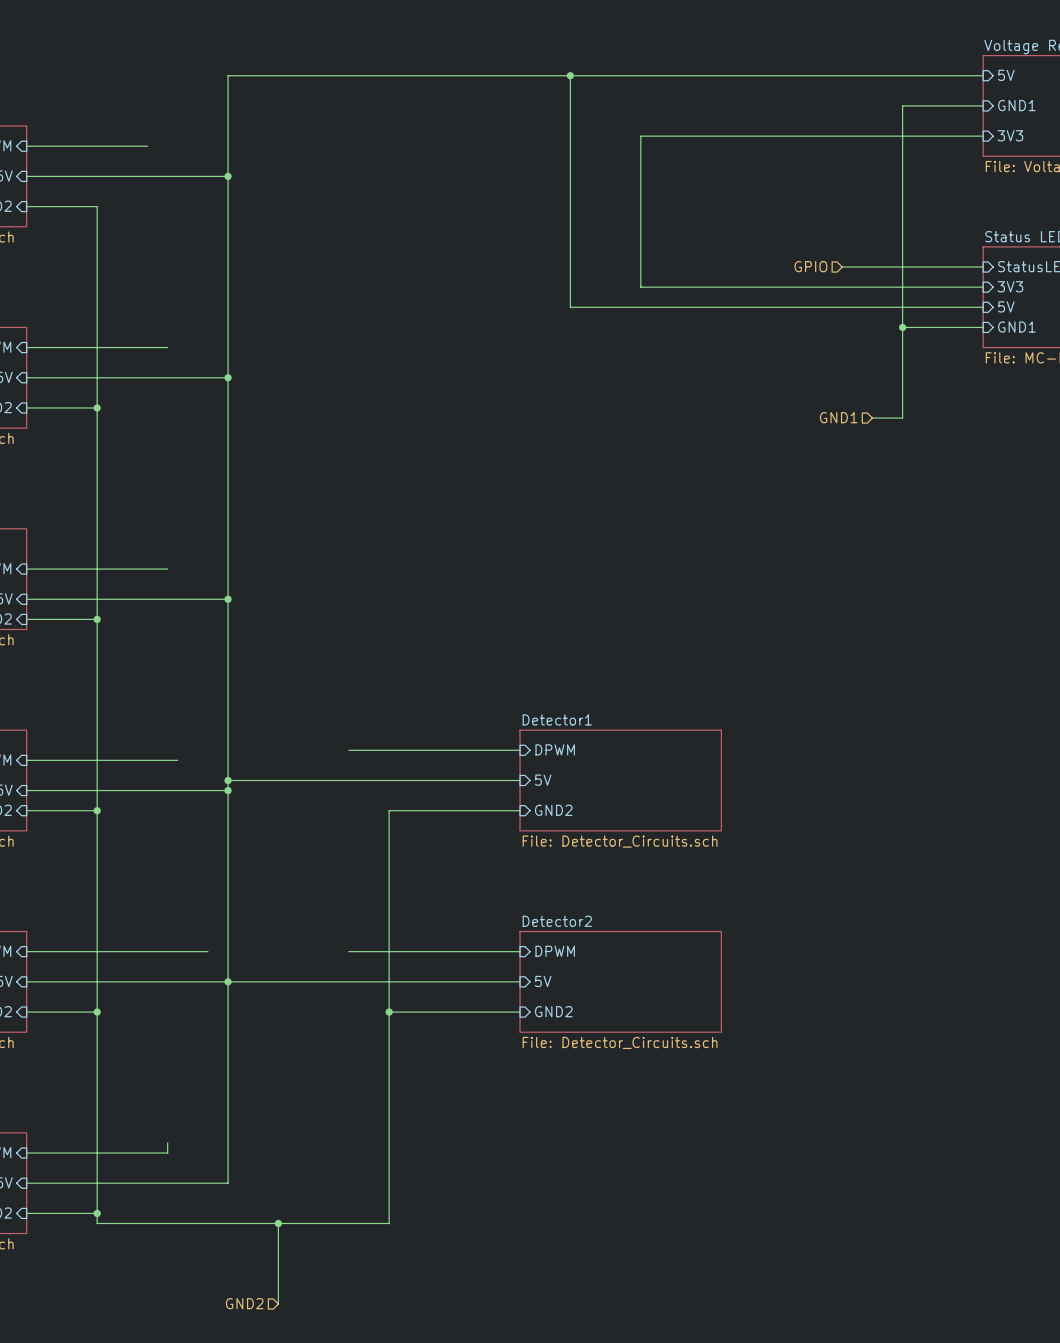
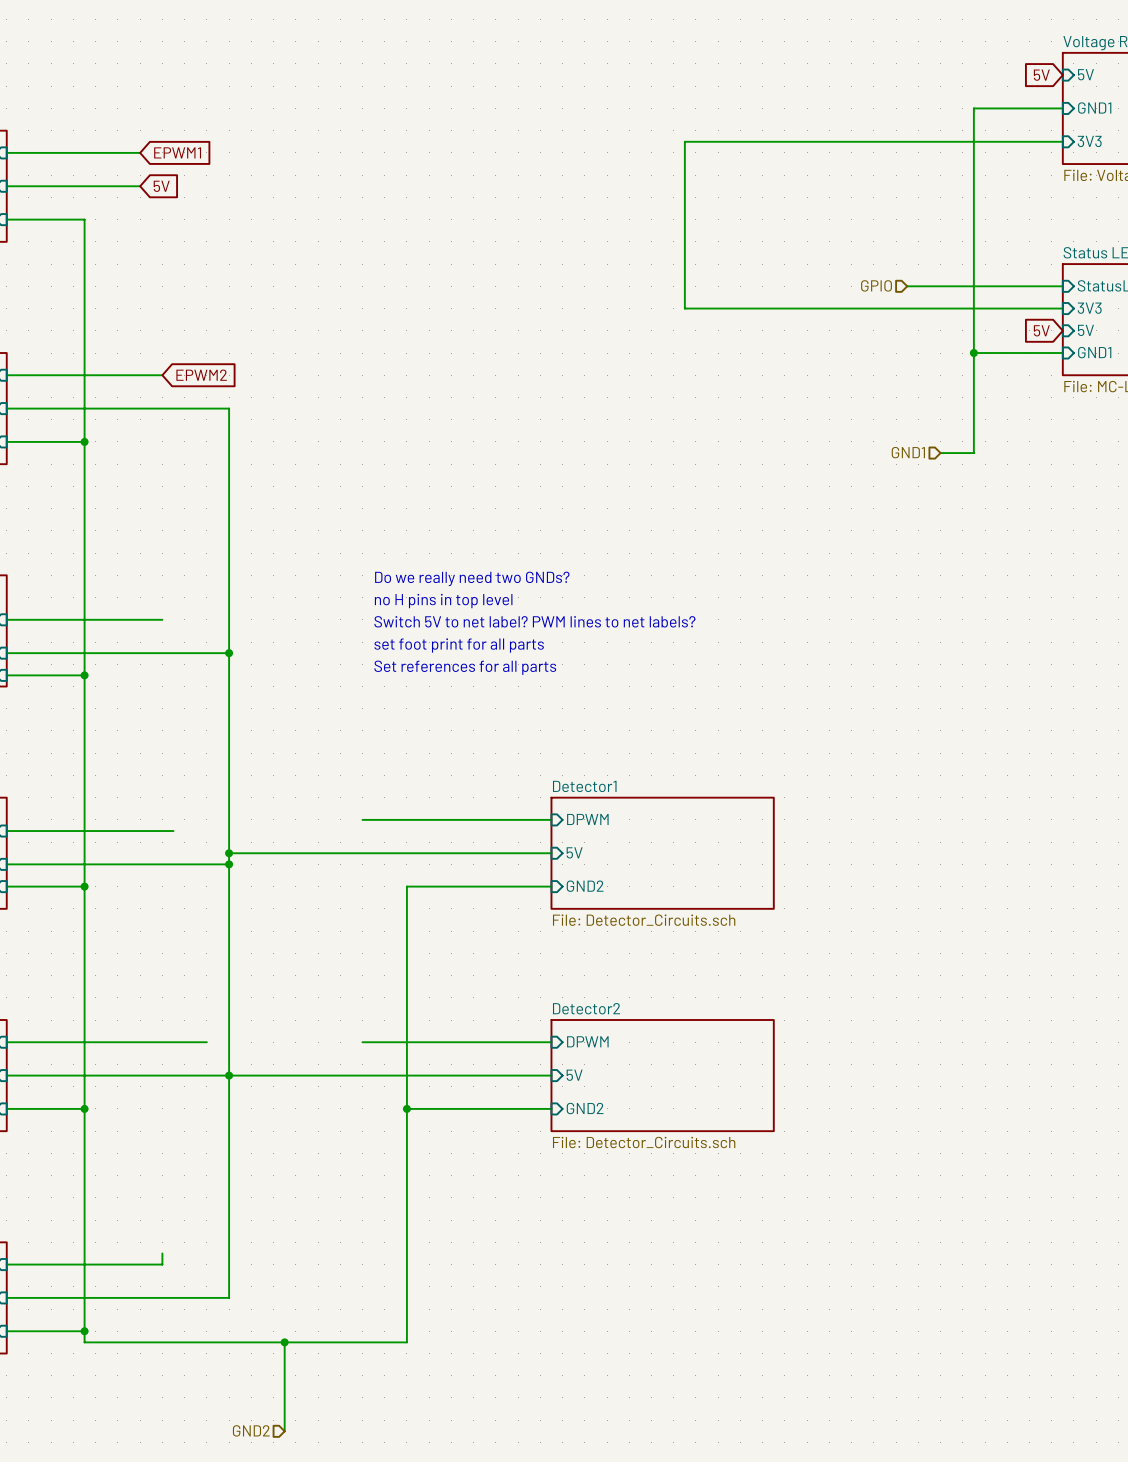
wire: (570, 75) (570, 307) (983, 307) -> none
junction: (570, 75) -> none
global label: none -> 5V (1041, 75)
wire: (983, 75) (228, 75) (228, 377) -> none
global label: none -> EPWM1 (177, 152)
wire: (147, 176) (228, 176) -> none
global label: none -> 5V (161, 186)
junction: (228, 176) -> none
global label: none -> 5V (1041, 330)
global label: none -> EPWM2 (201, 375)
junction: (228, 377) -> none
text: none -> Do we really need two GNDs? (472, 578)
text: none -> no H pins in top level (443, 601)
text: none -> Switch 5V to net label? PWM lines to net labels? (534, 621)
text: none -> set foot print for all parts (459, 645)
text: none -> Set references for all parts (465, 667)

